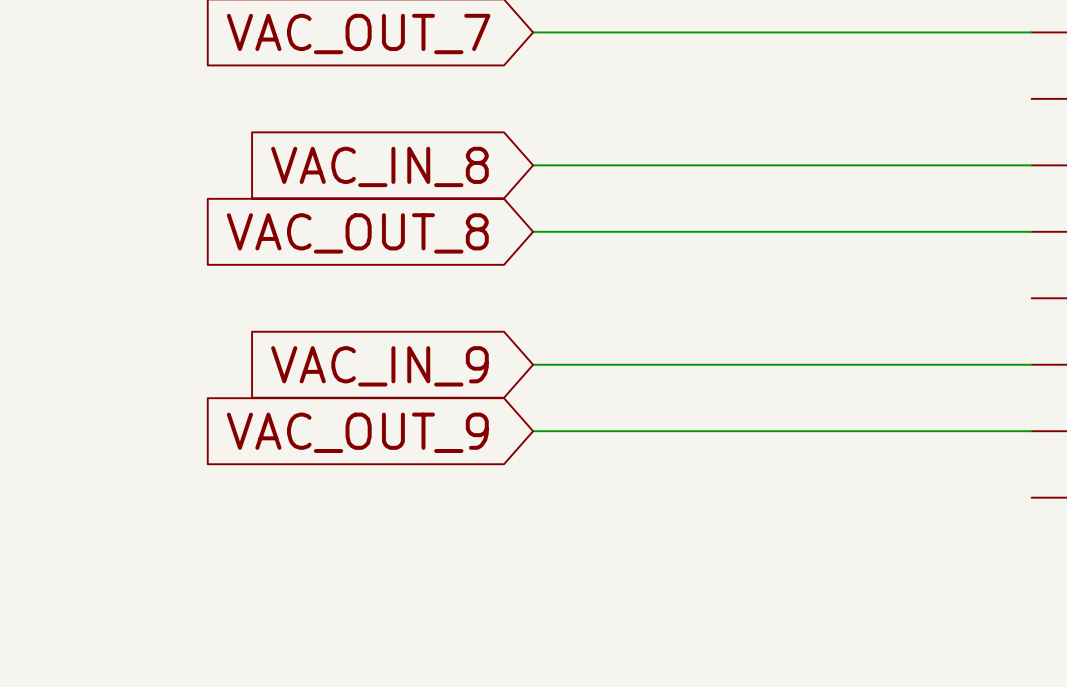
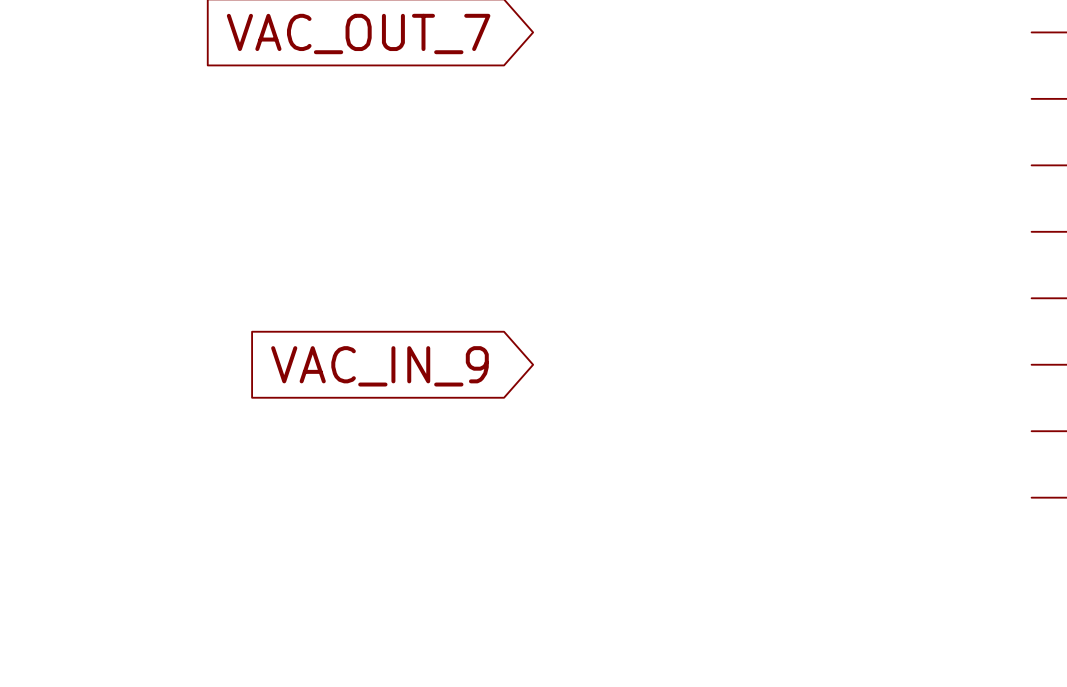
wire: (533, 32) (1031, 32) -> none
wire: (533, 165) (1031, 165) -> none
global label: VAC_IN_8 (379, 166) -> none
wire: (533, 231) (1031, 231) -> none
global label: VAC_OUT_8 (357, 233) -> none
wire: (533, 364) (1031, 364) -> none
wire: (533, 431) (1031, 431) -> none
global label: VAC_OUT_9 (357, 432) -> none

